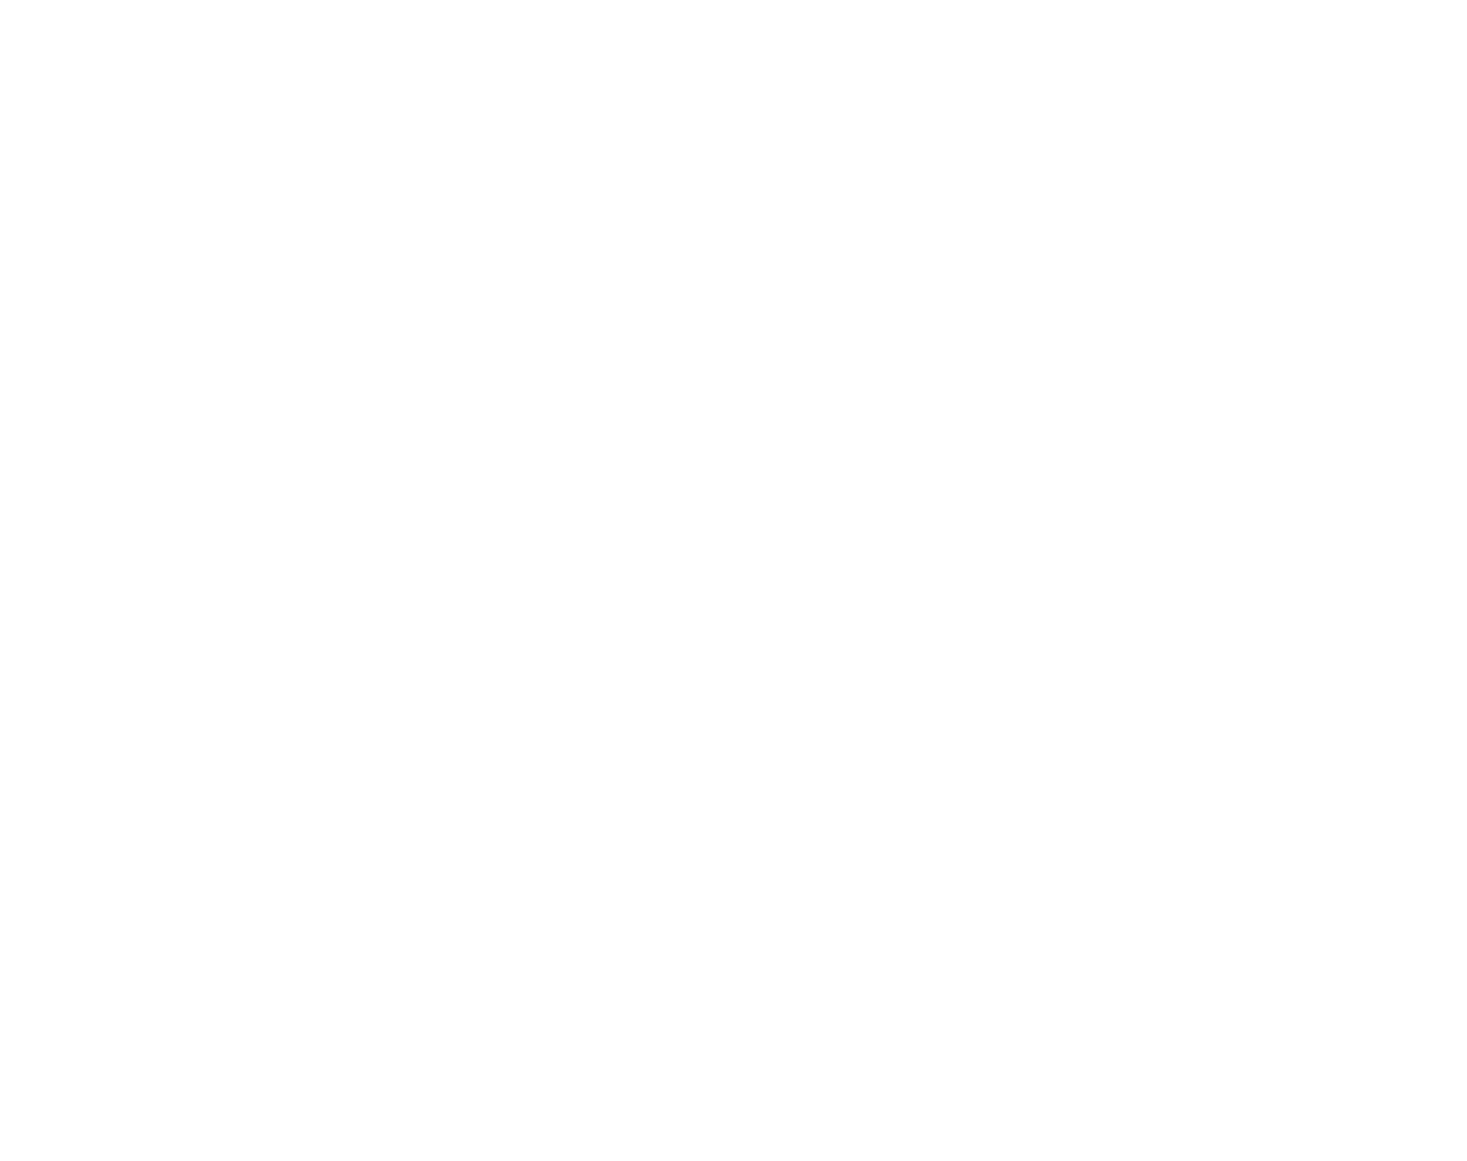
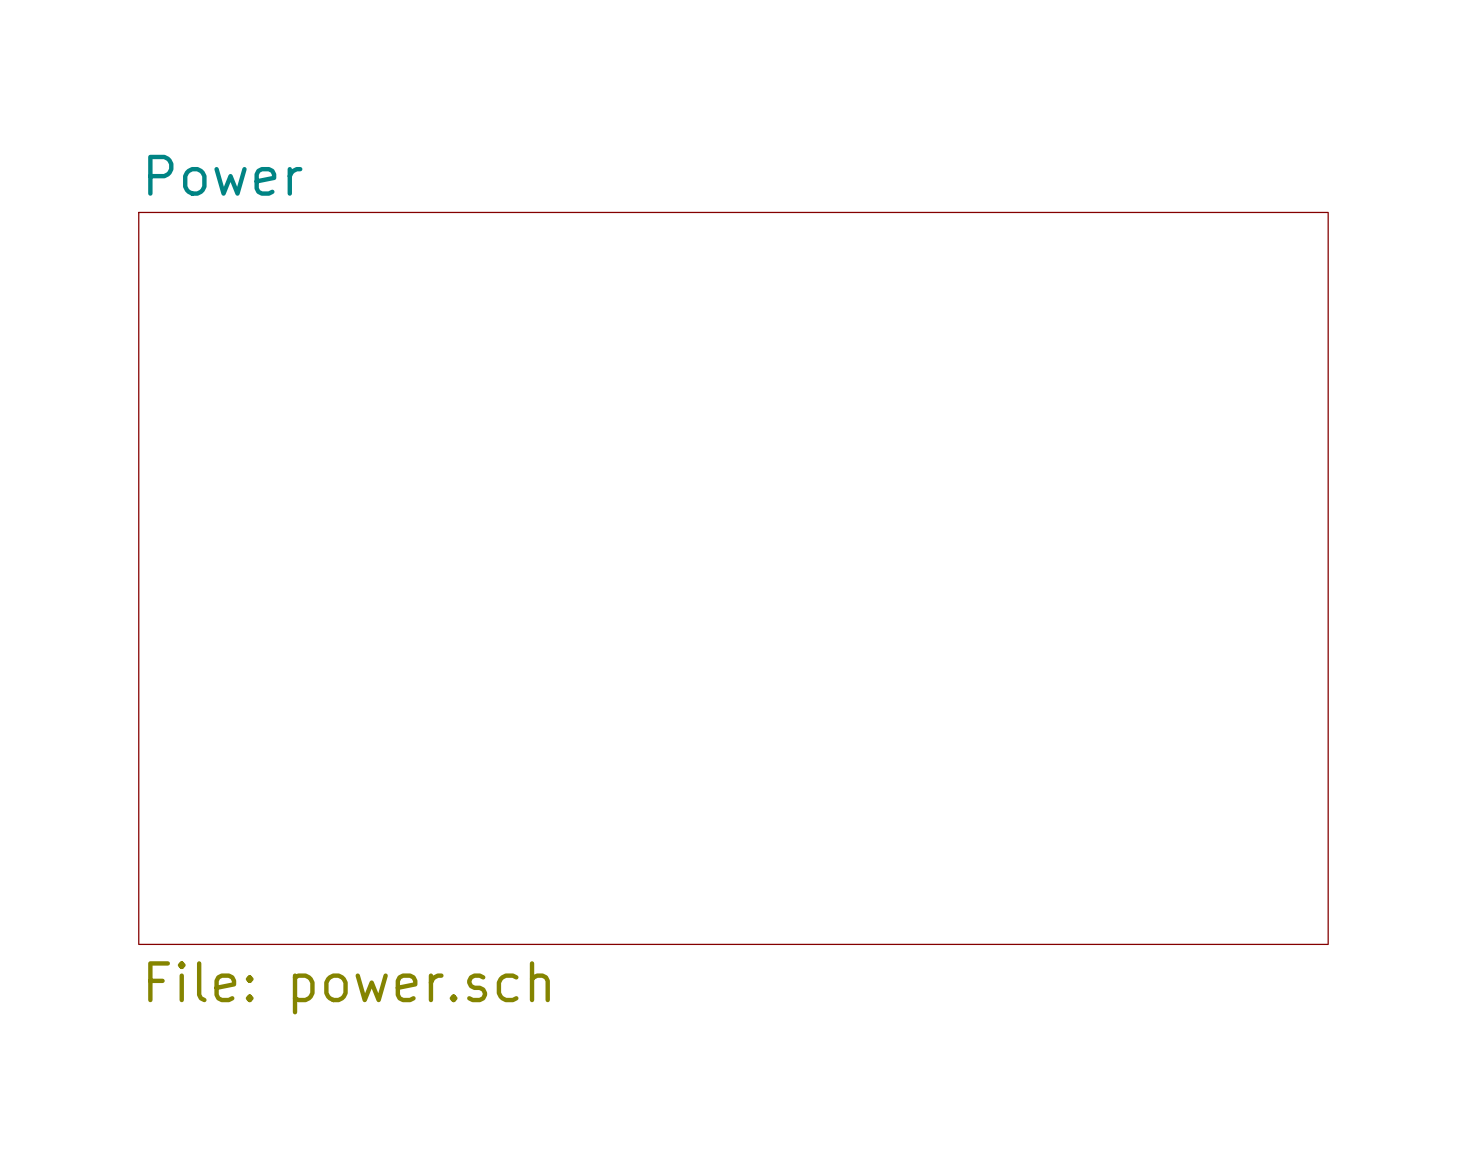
sheet Power: none -> File: power.sch (733, 578)

